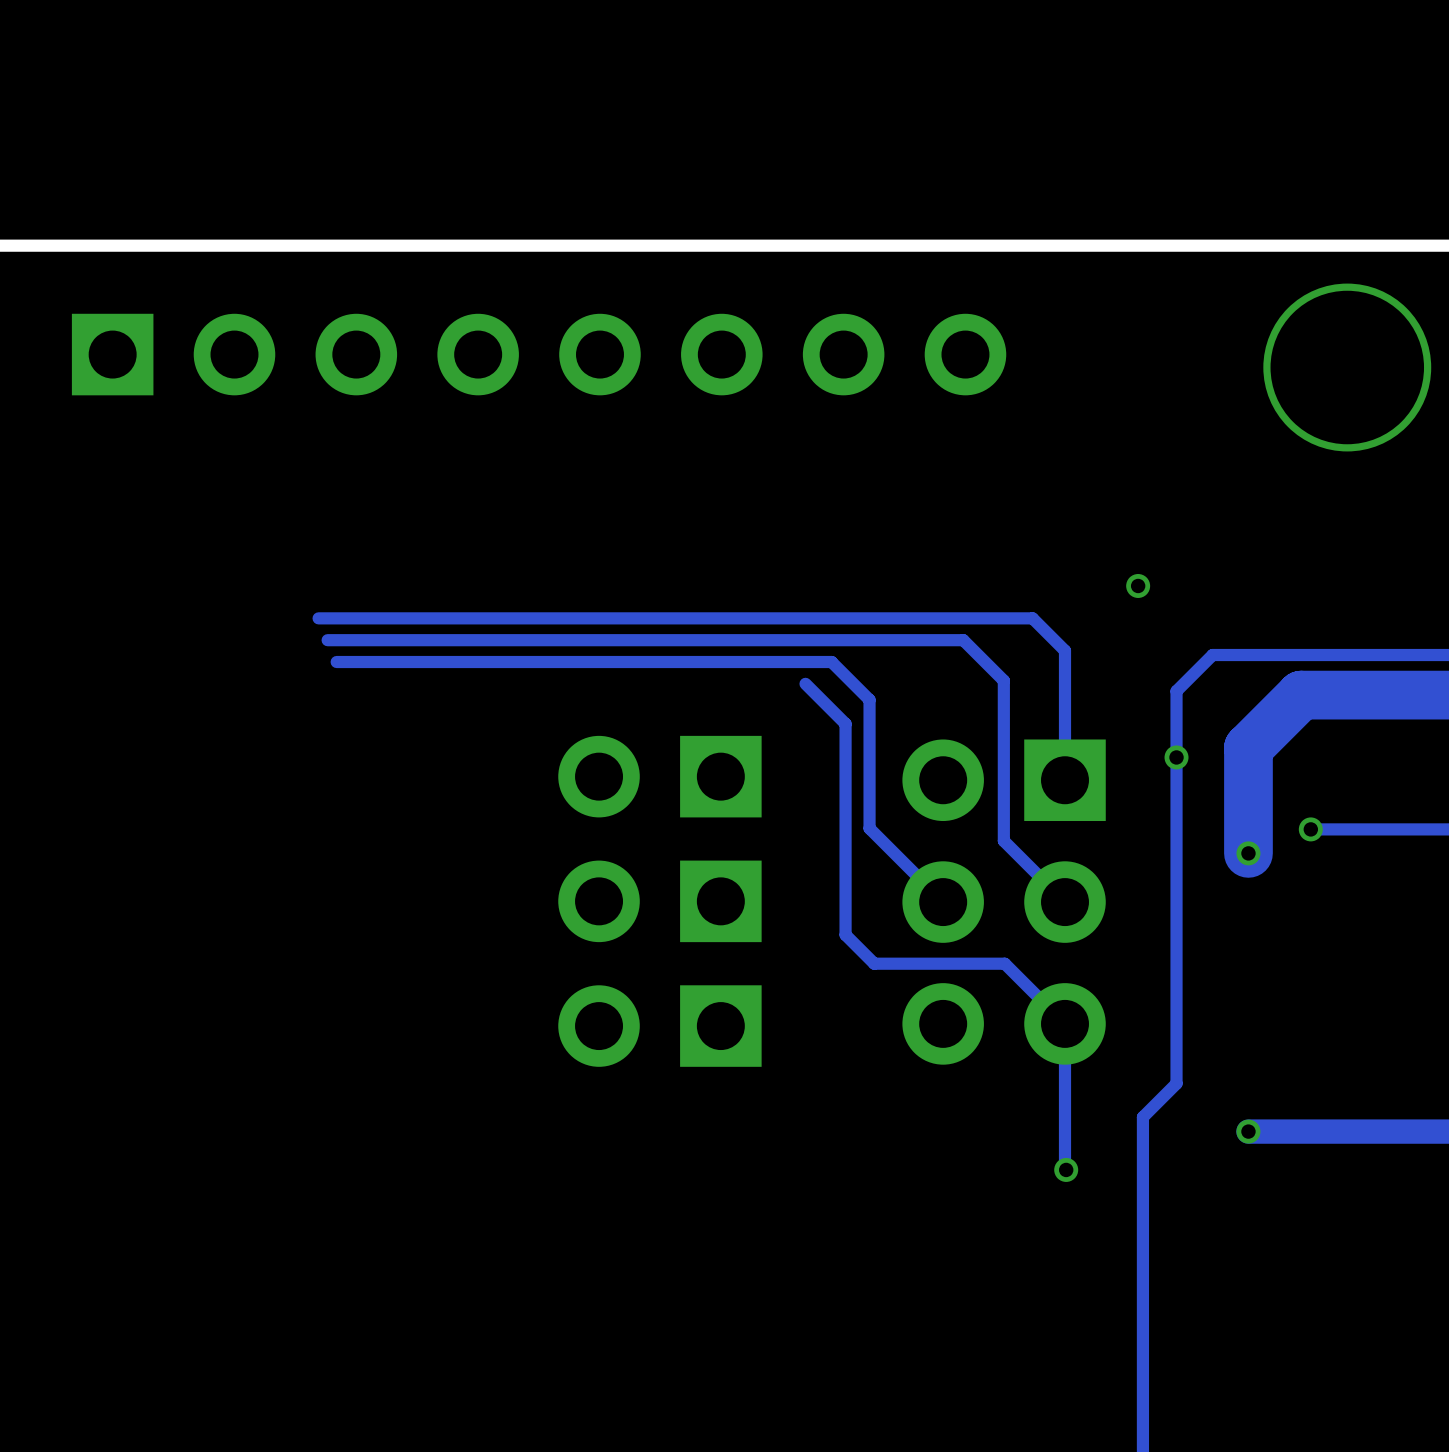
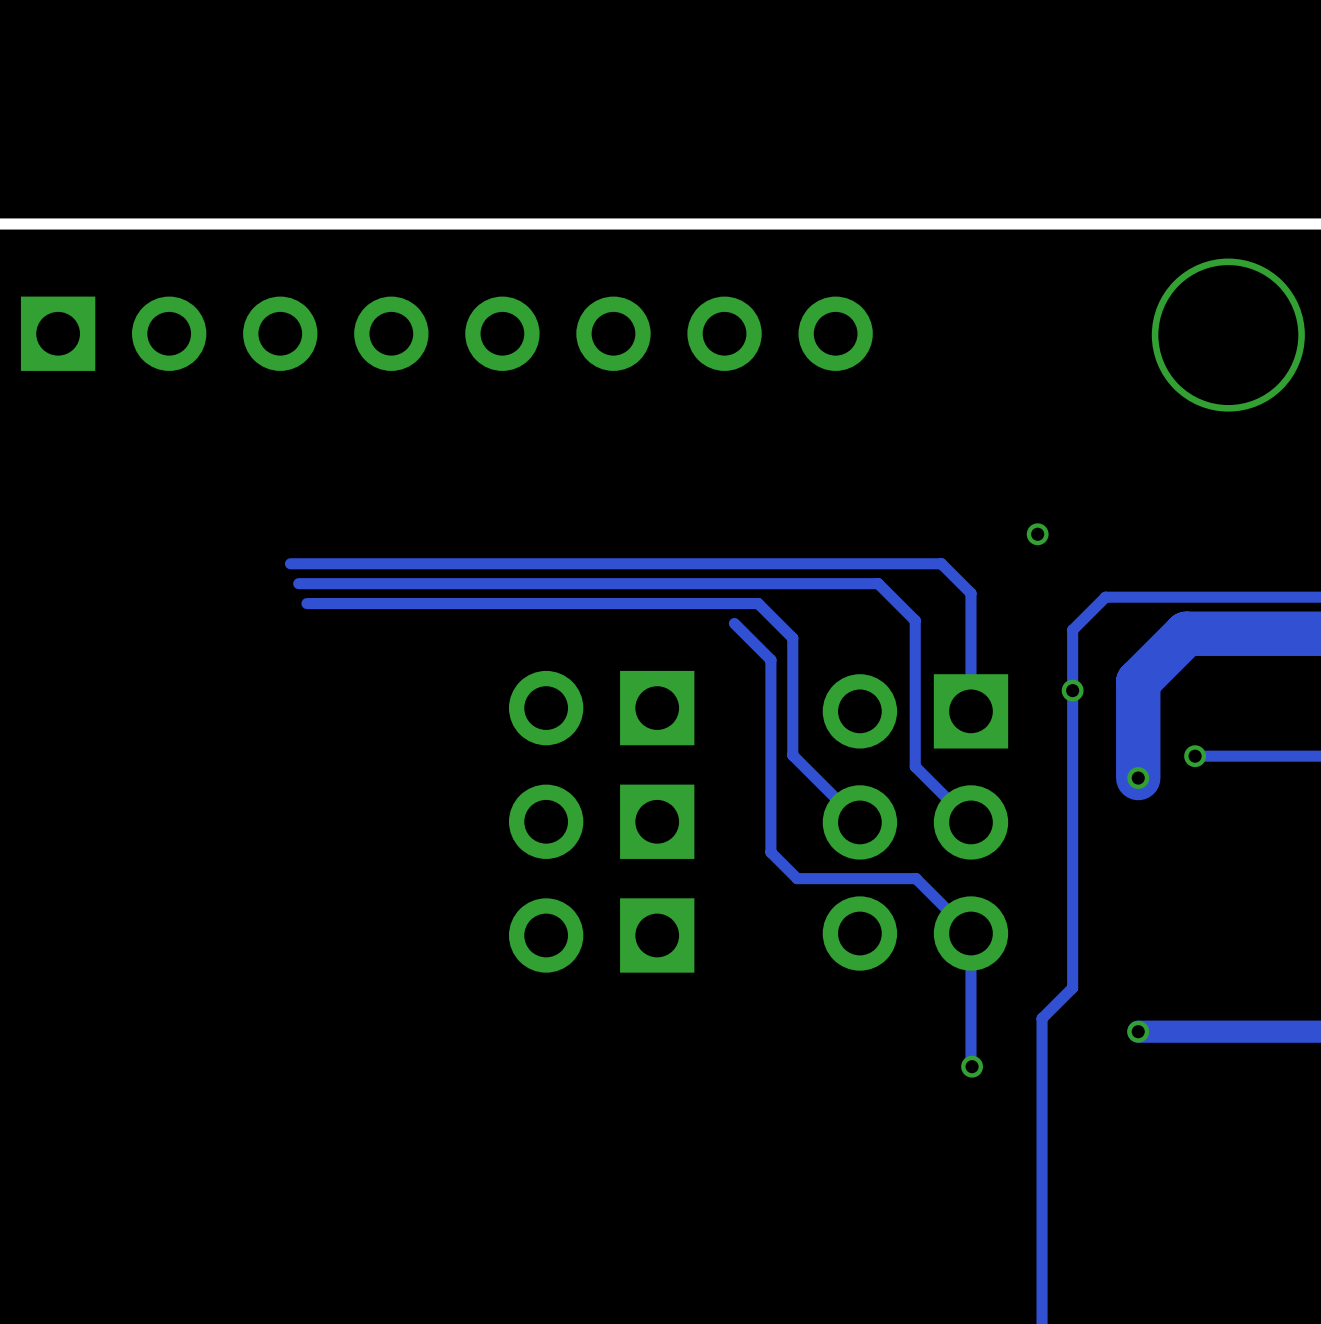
part position: (539, 354) -> (446, 333)

